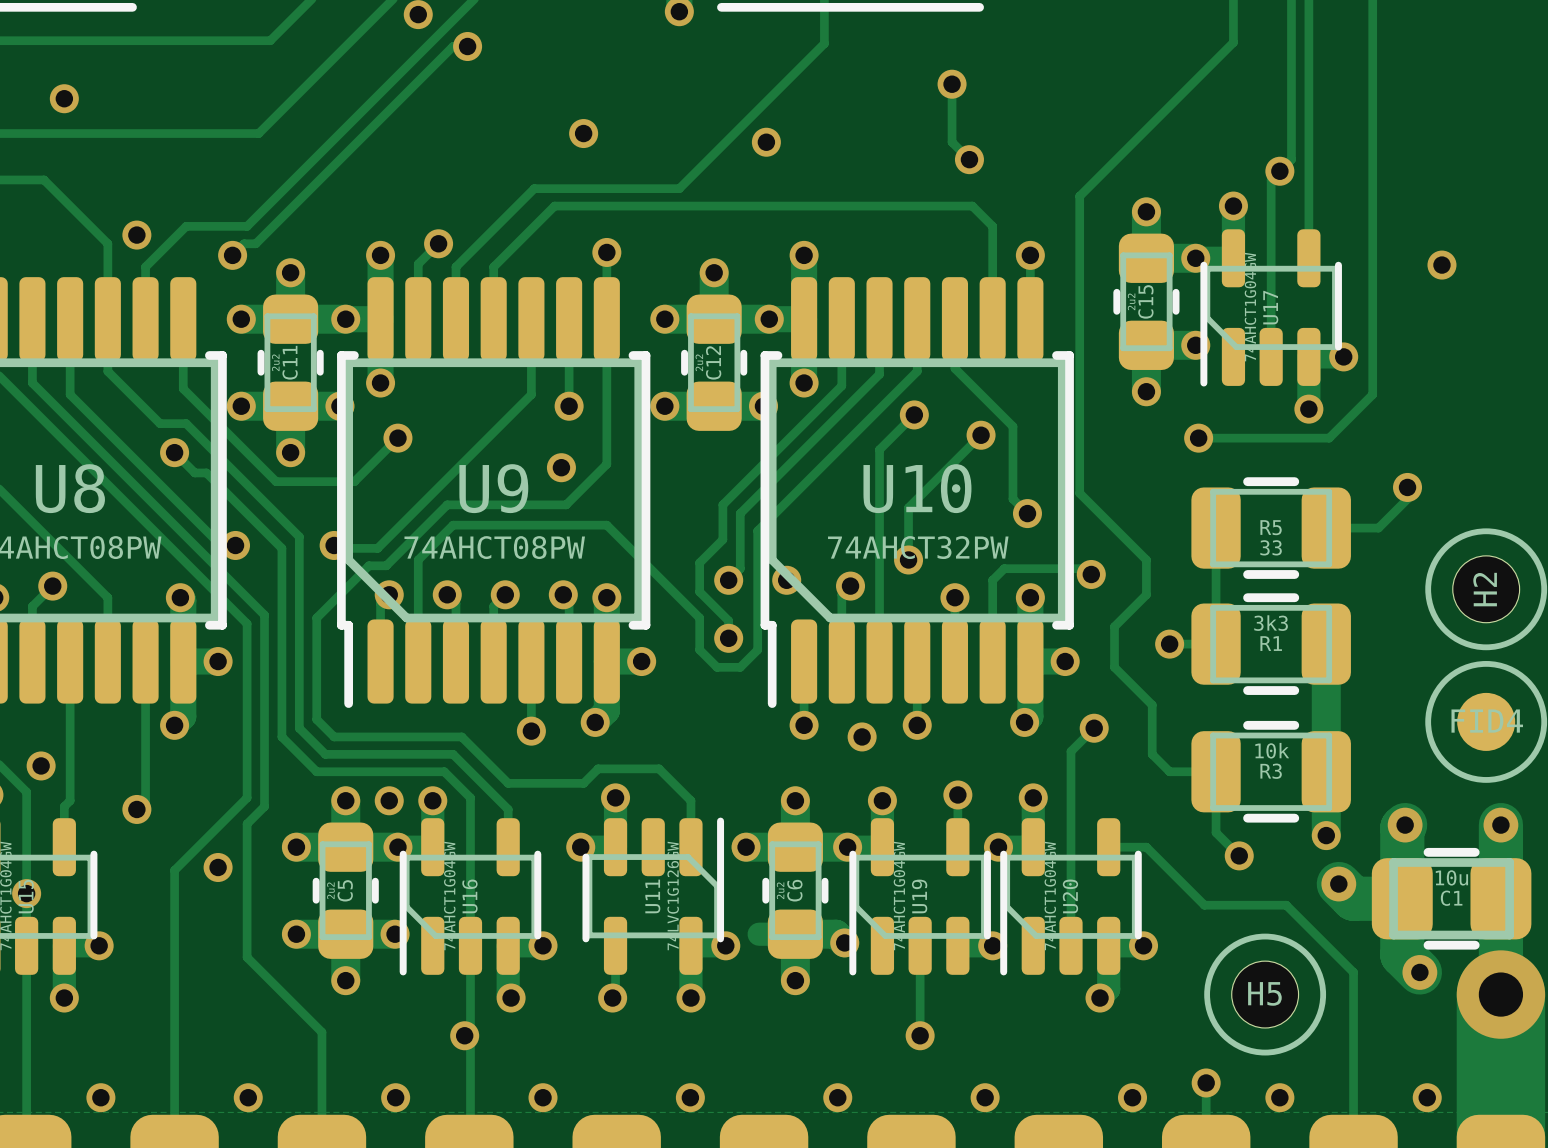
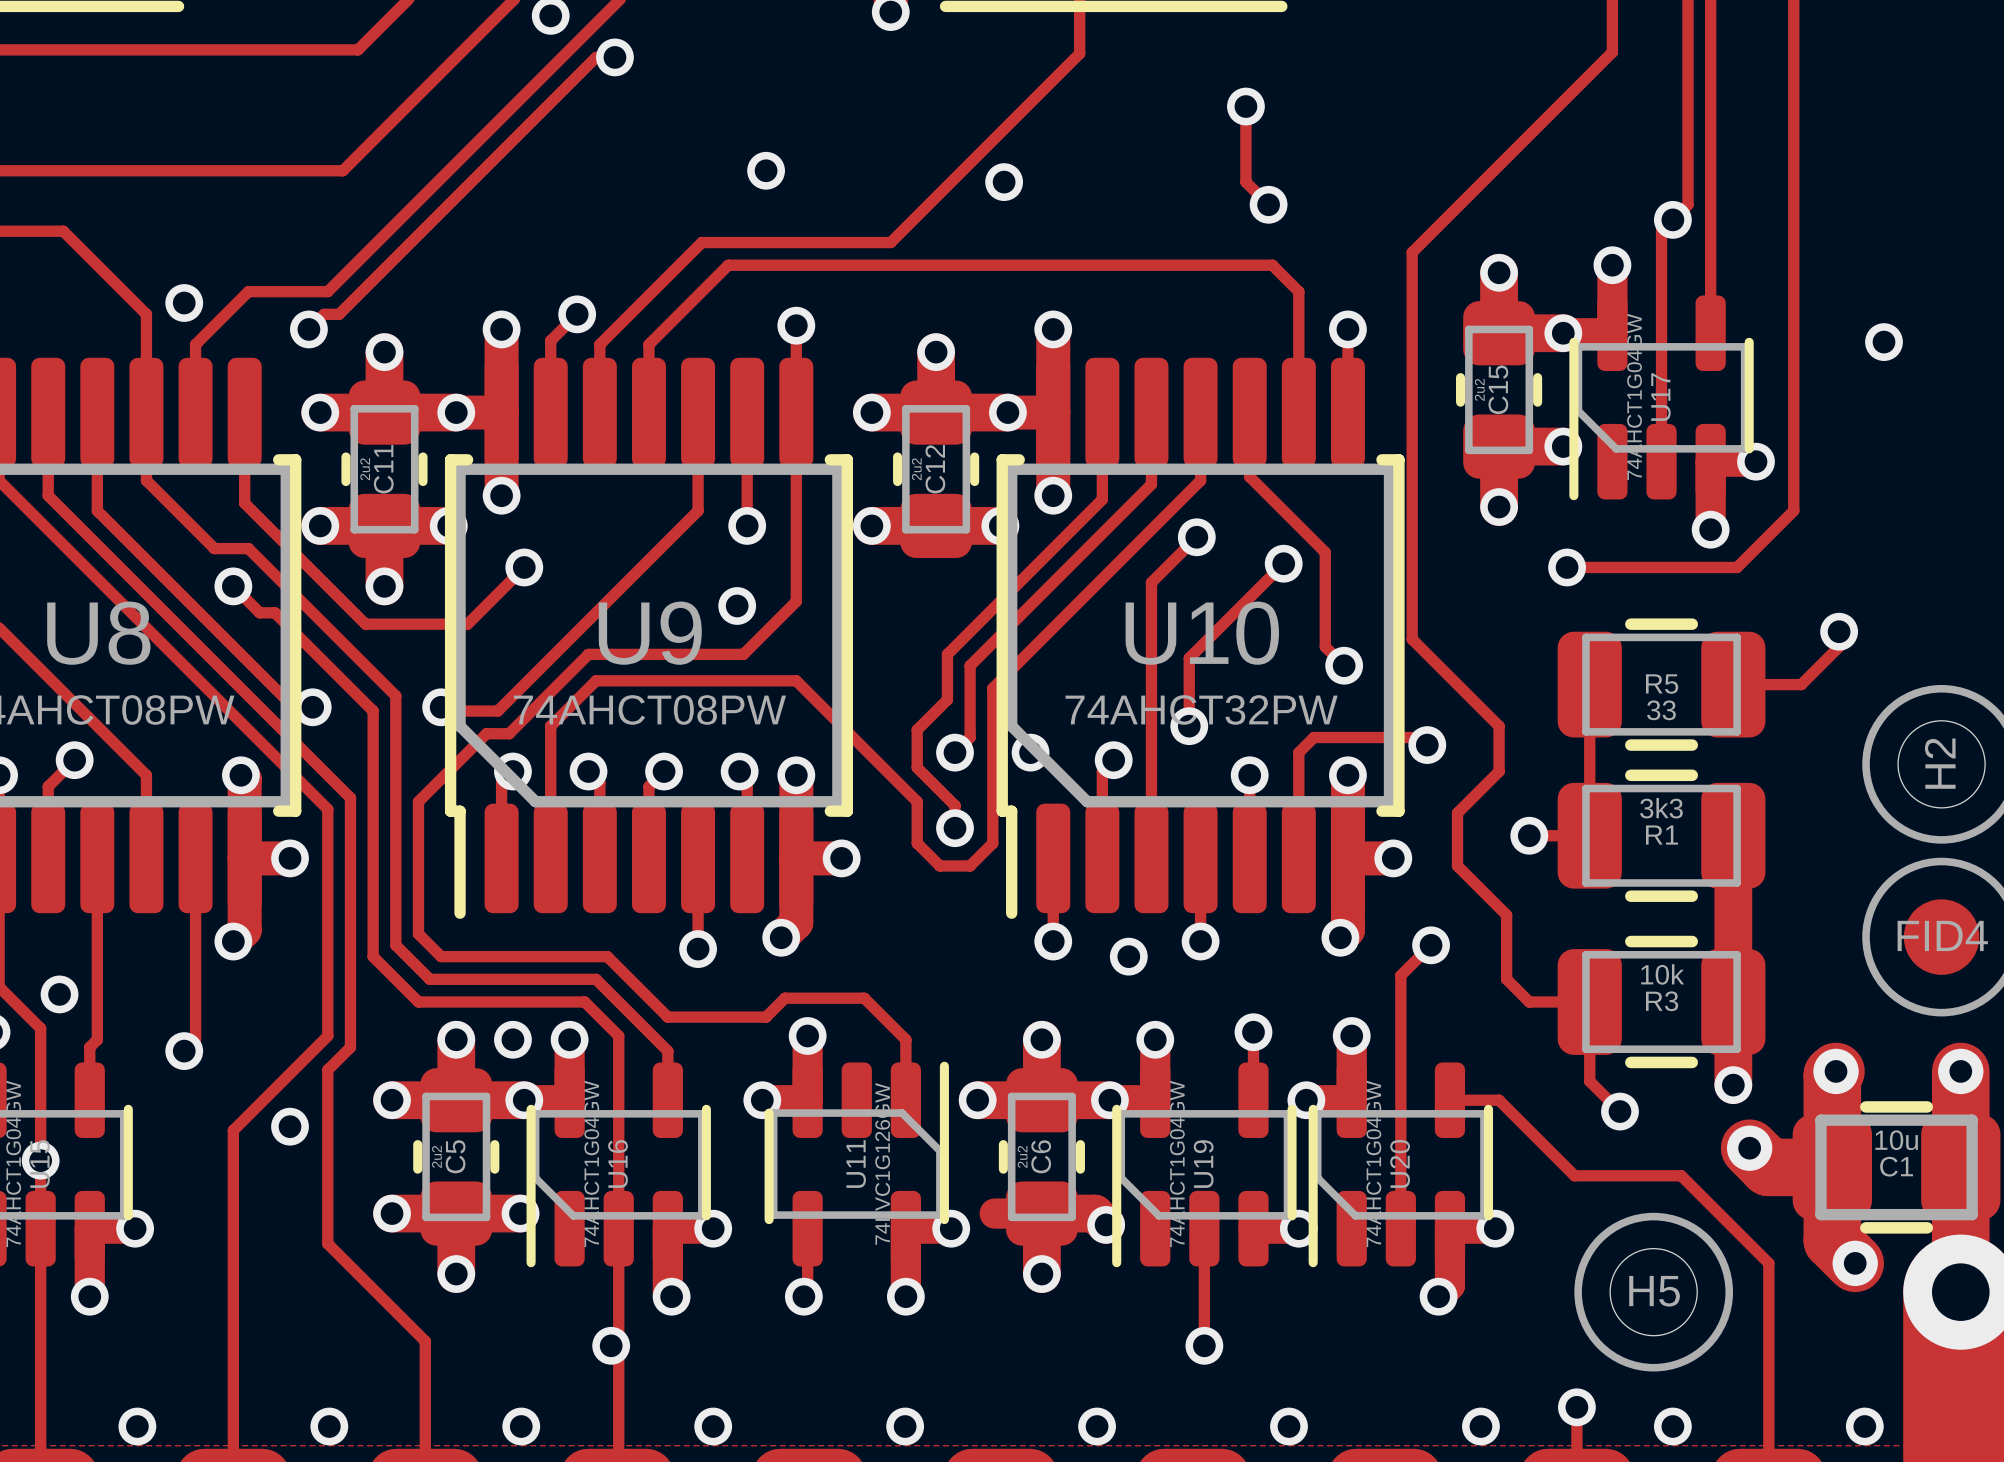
via: (64, 98) -> none

